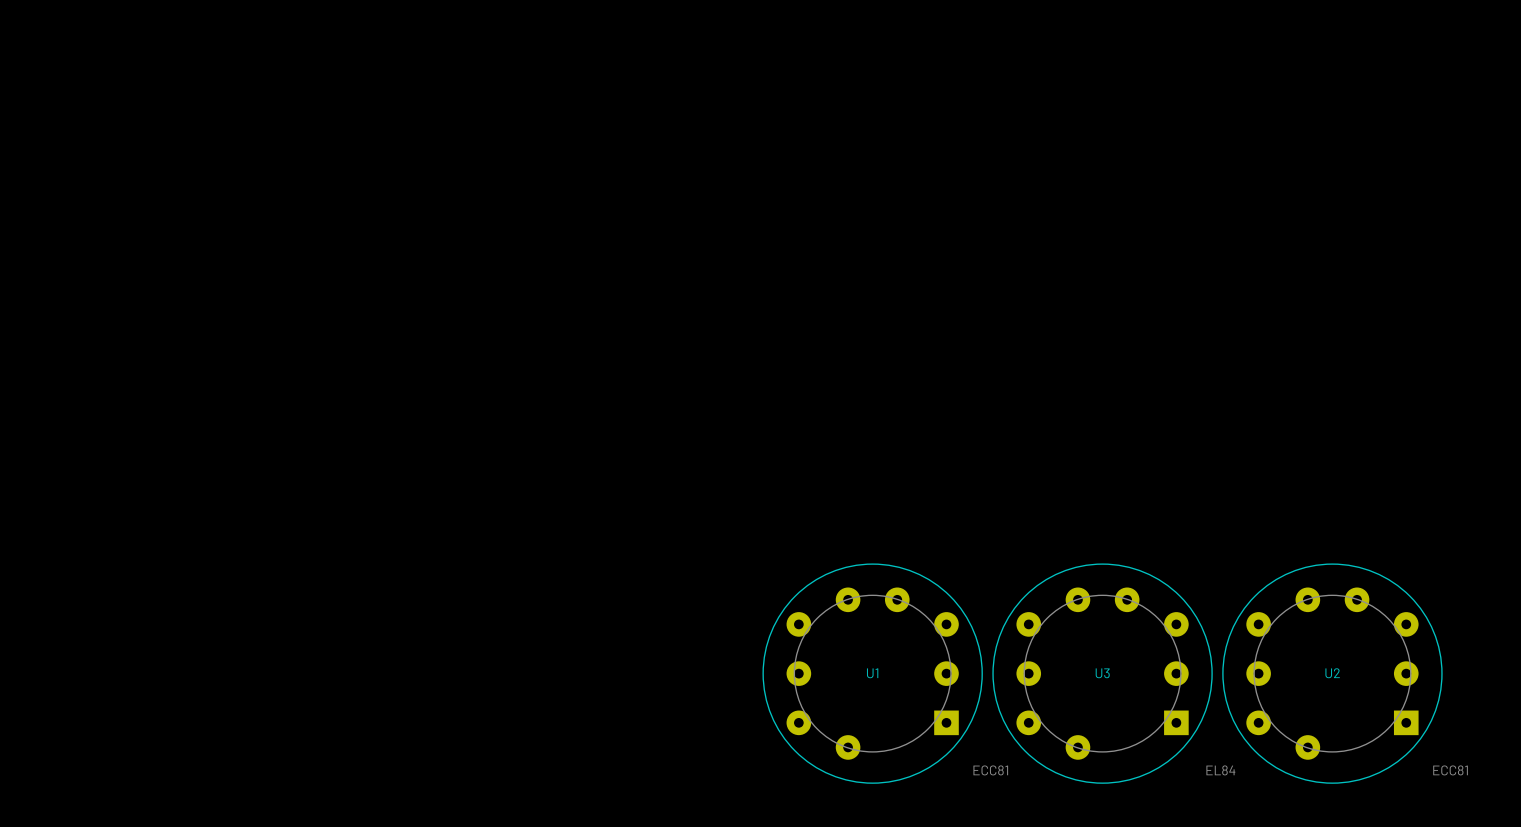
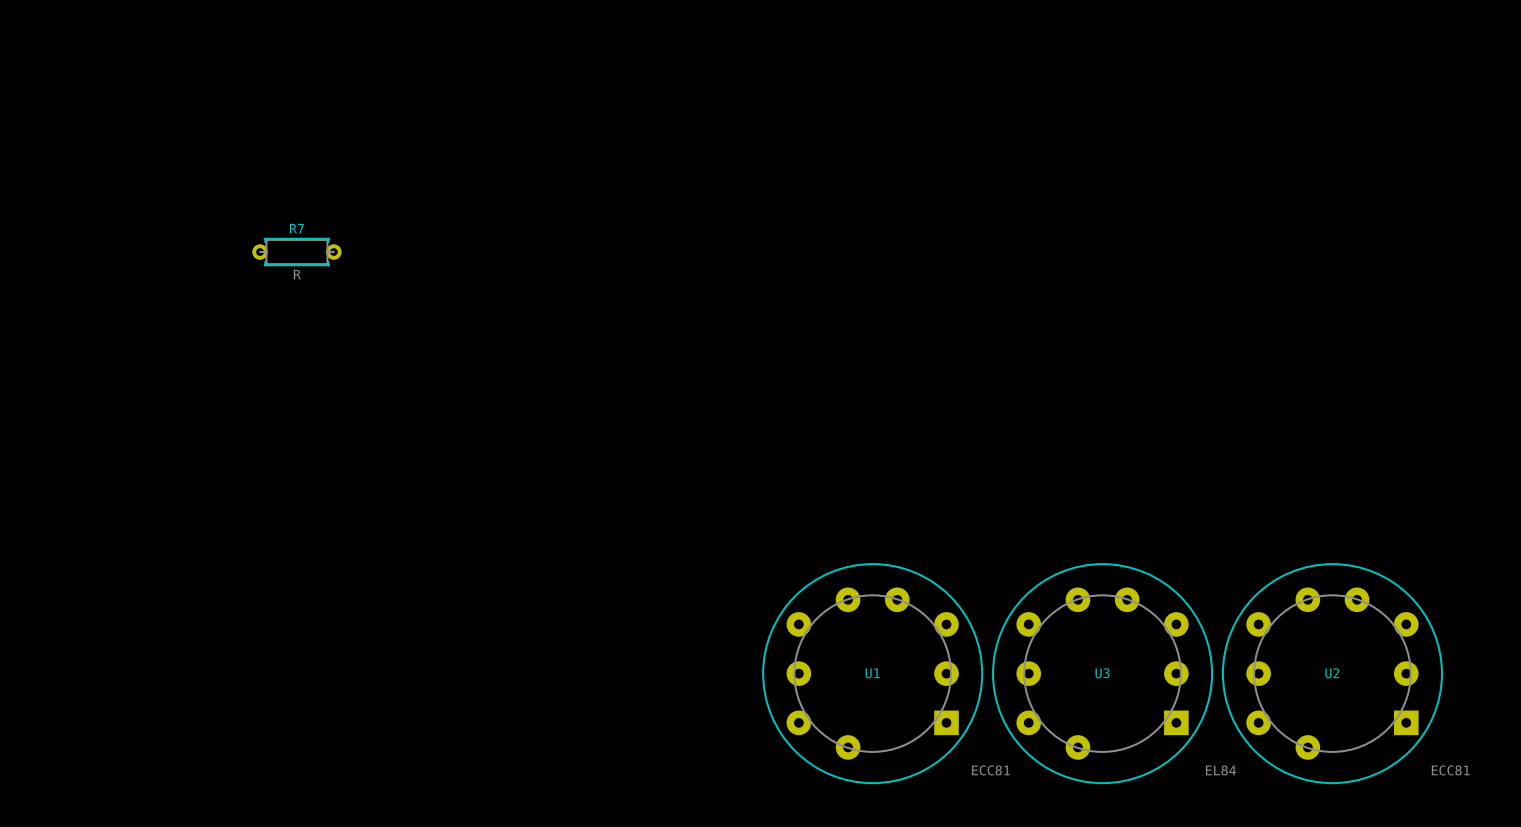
R7: none -> R (296, 252)

